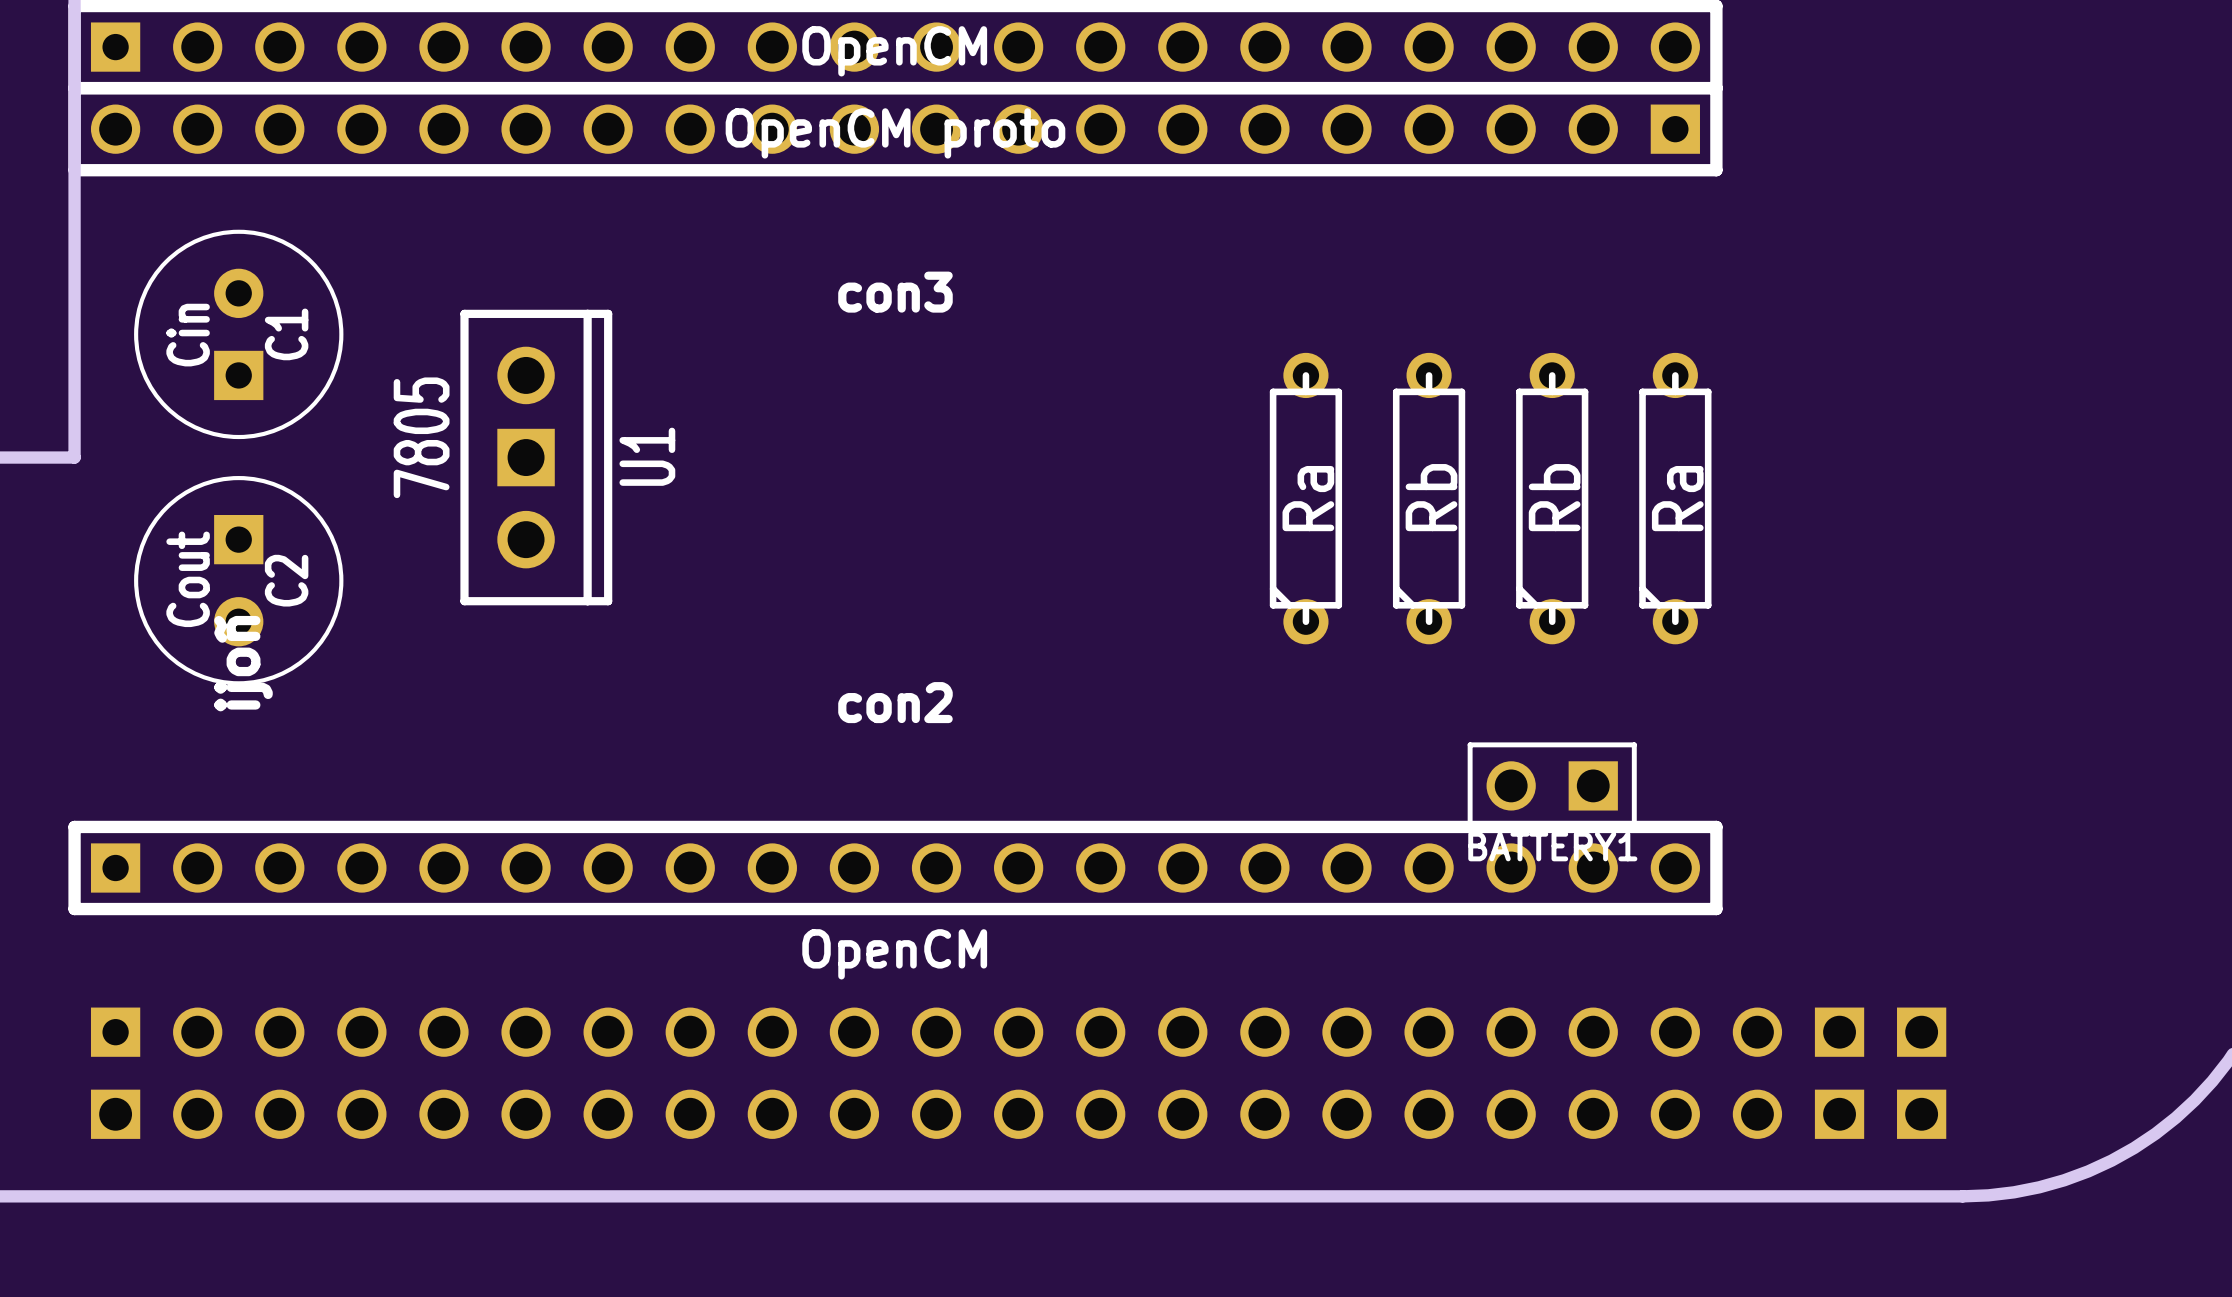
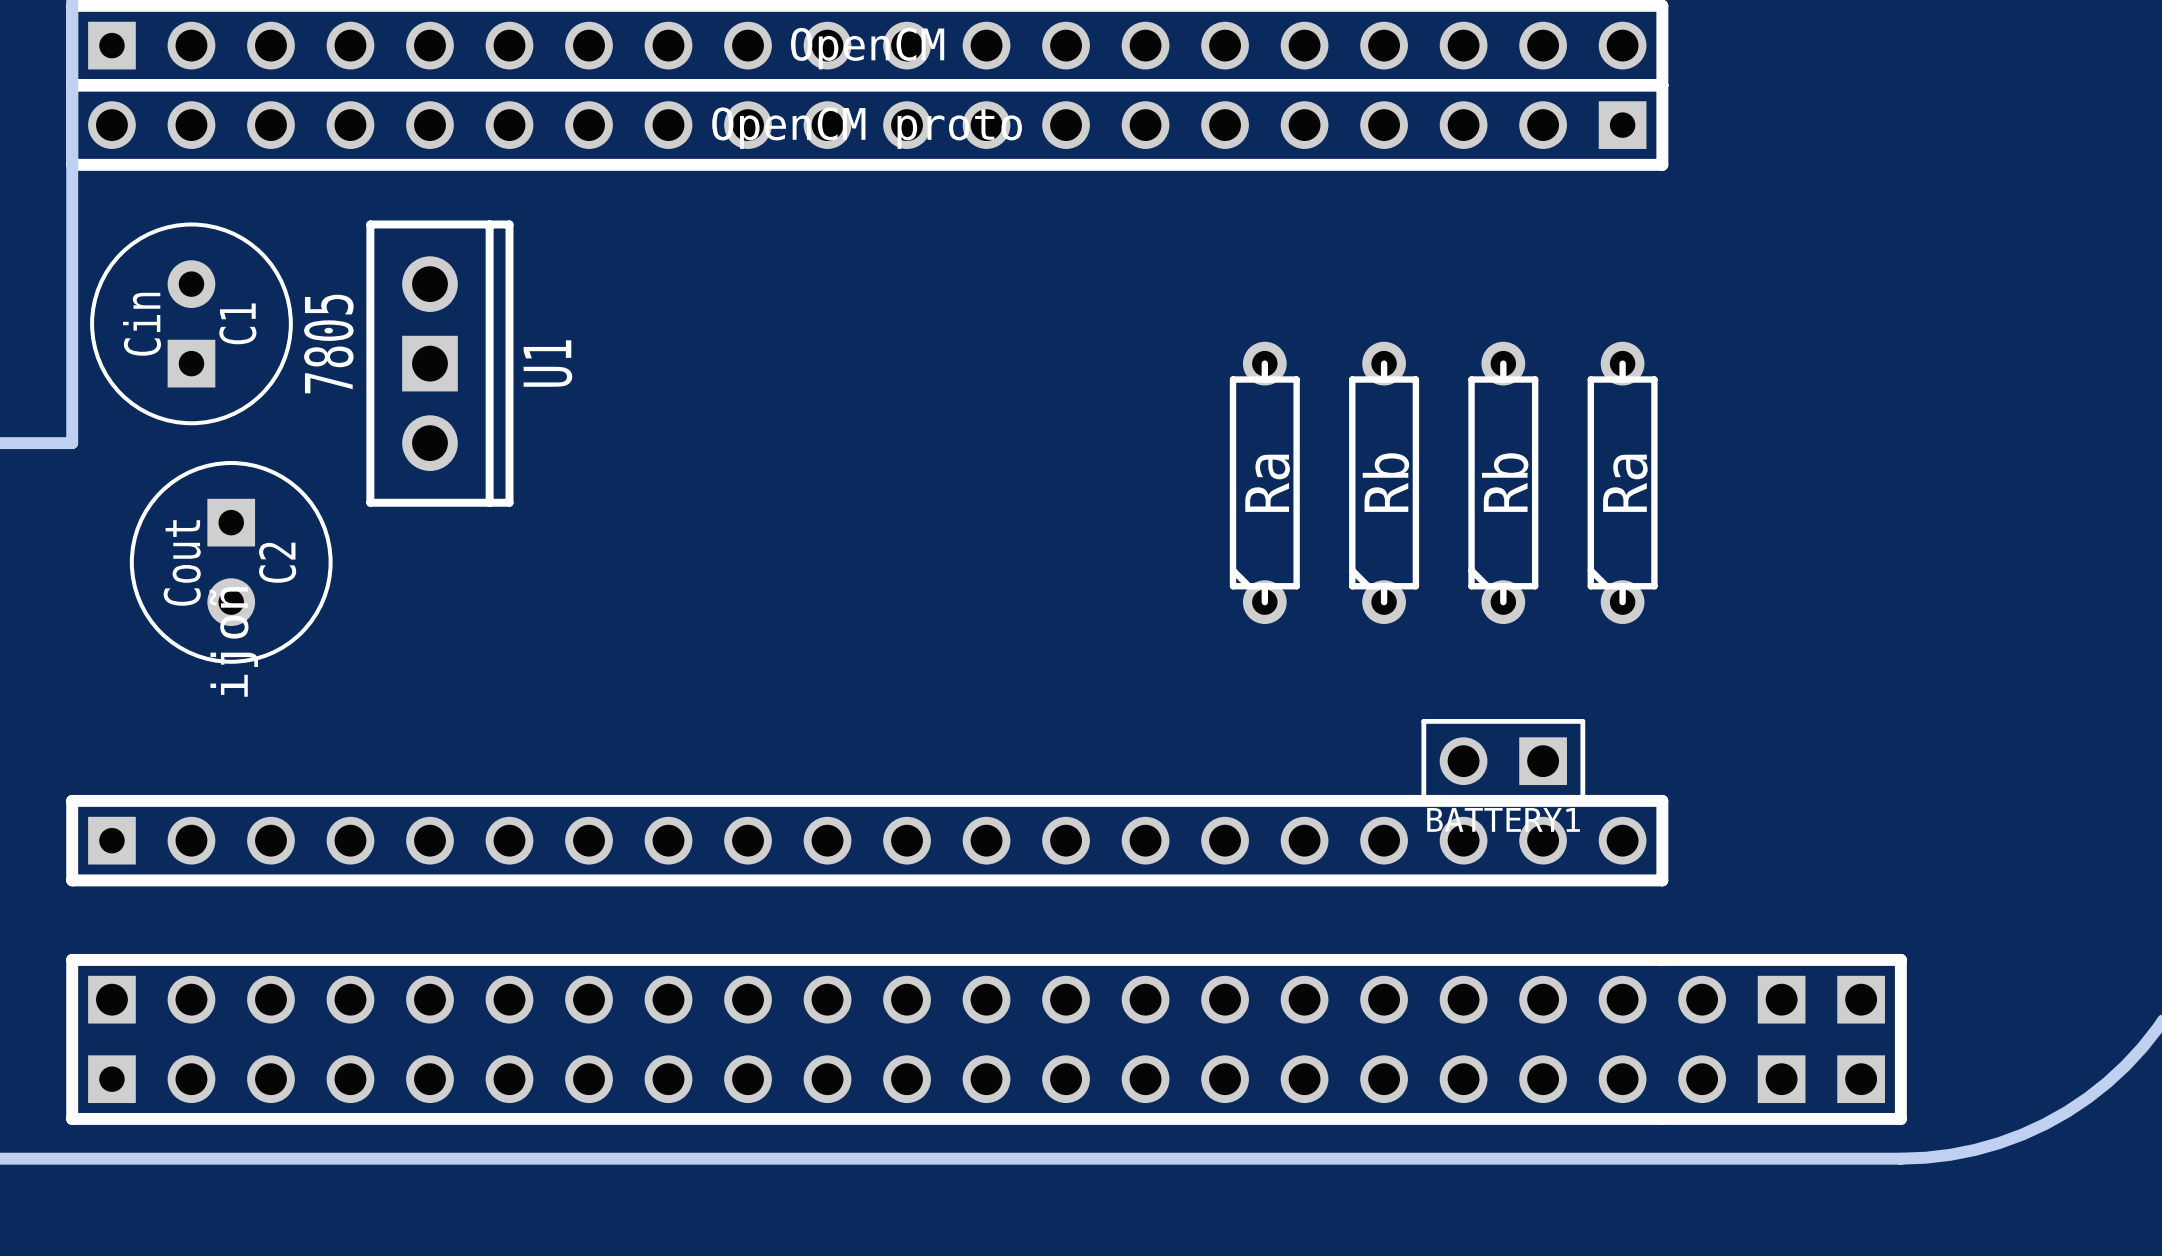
con3 name: con3 (895, 292) -> none
C1 position: (238, 334) -> (191, 323)
U1 position: (536, 457) -> (439, 363)
con2 name: con2 (895, 702) -> none
con2 value: OpenCM (894, 954) -> none
part side: bottom (895, 1073) -> top (867, 1039)
part side: bottom (1839, 1073) -> top (1781, 1039)

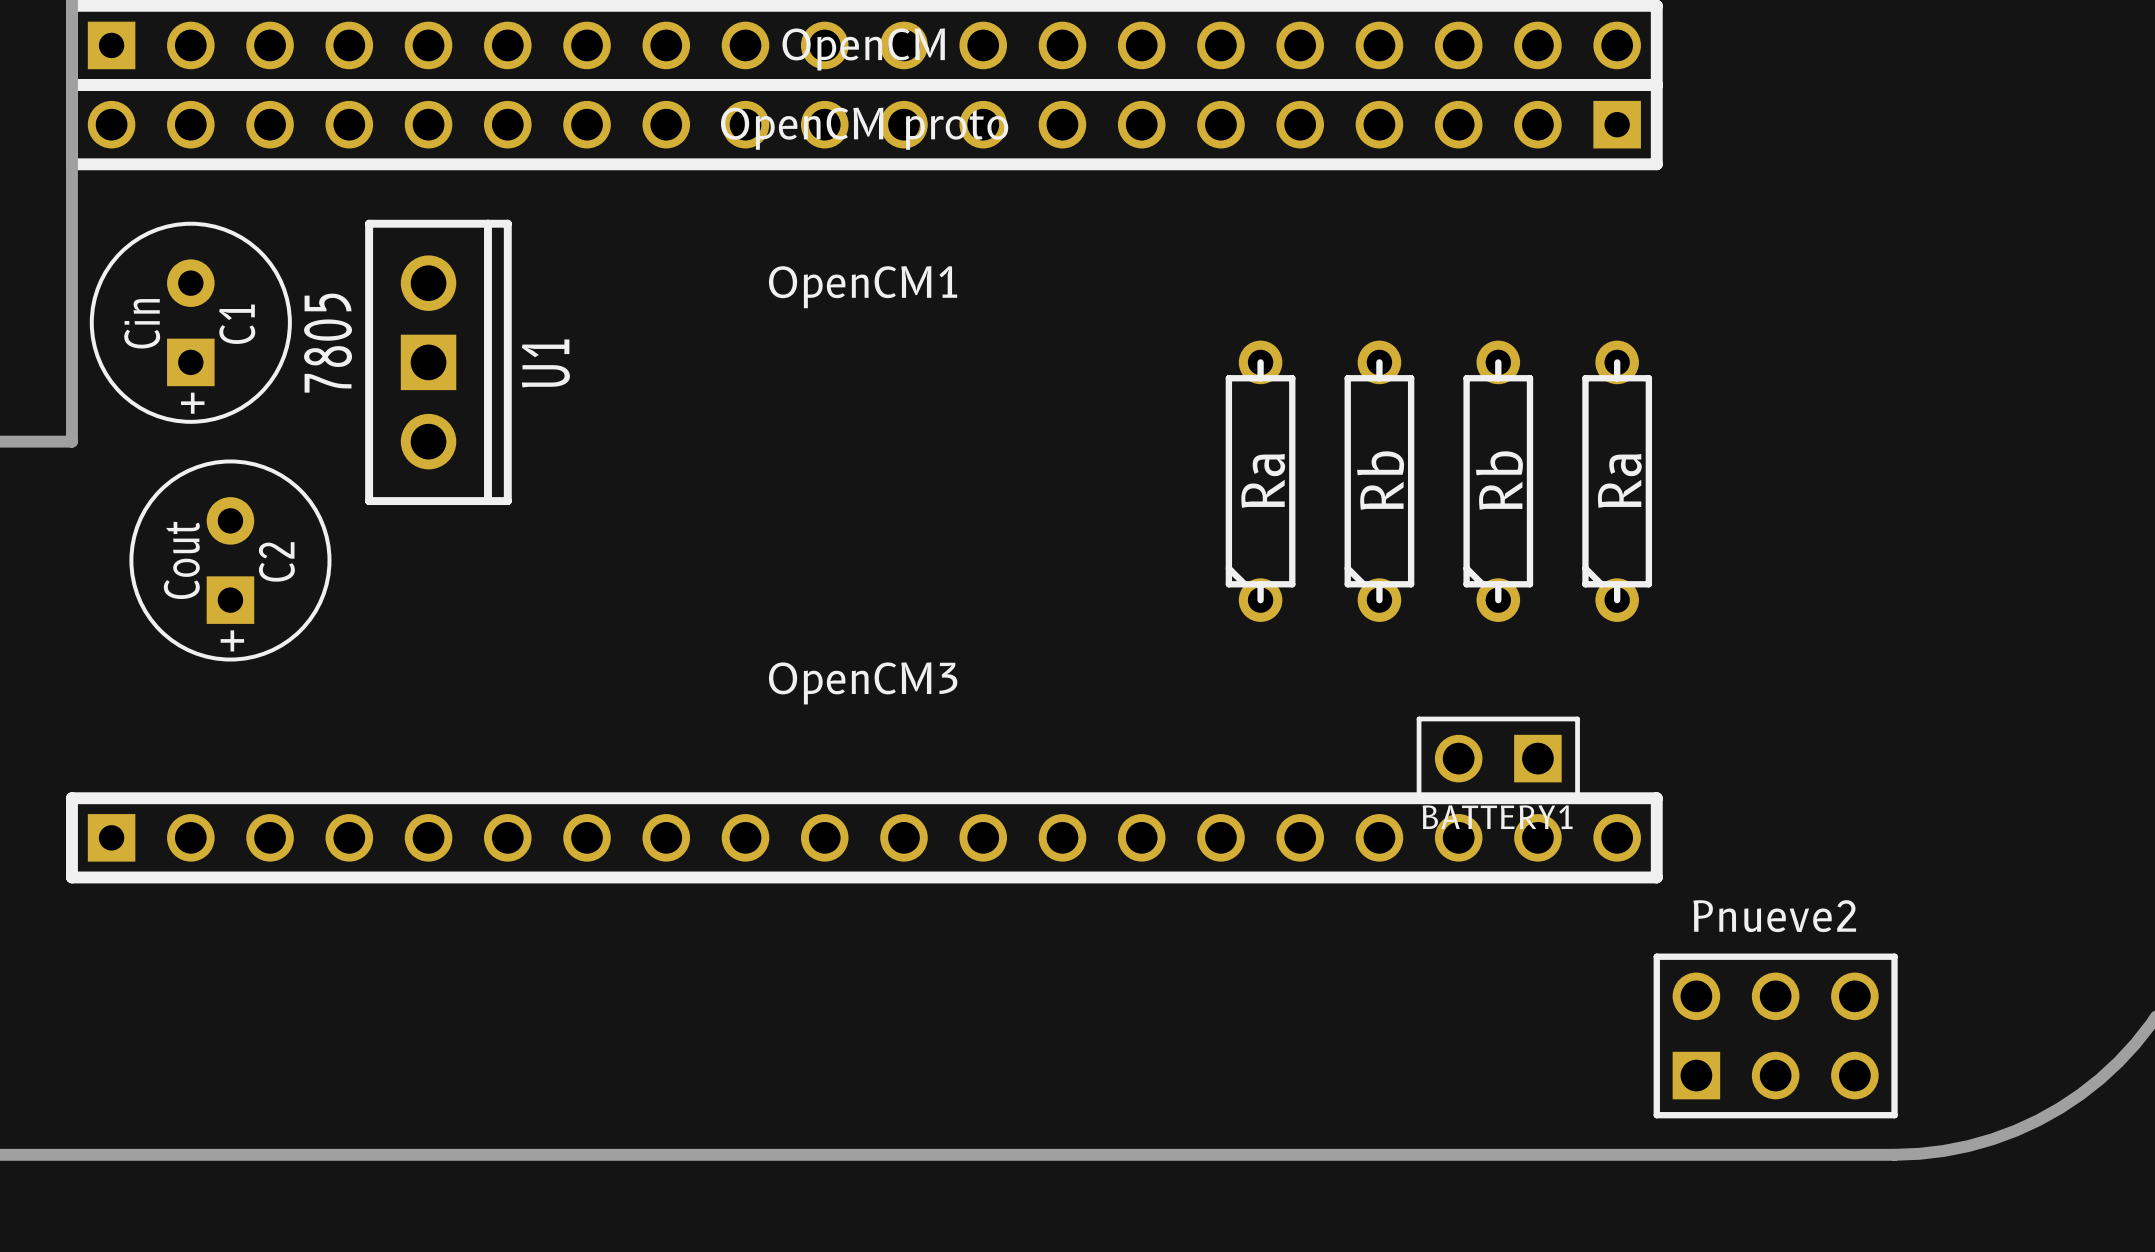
OpenCM1 name: none -> OpenCM1 (863, 287)
C1 text: none -> + (192, 403)
C2 footprint: [129, 461, 333, 664] -> [129, 459, 332, 662]
OpenCM3 name: none -> OpenCM3 (863, 683)
part: (867, 1039) -> none
part: (1781, 1039) -> none
Pnueve2: none -> (1775, 1035)

